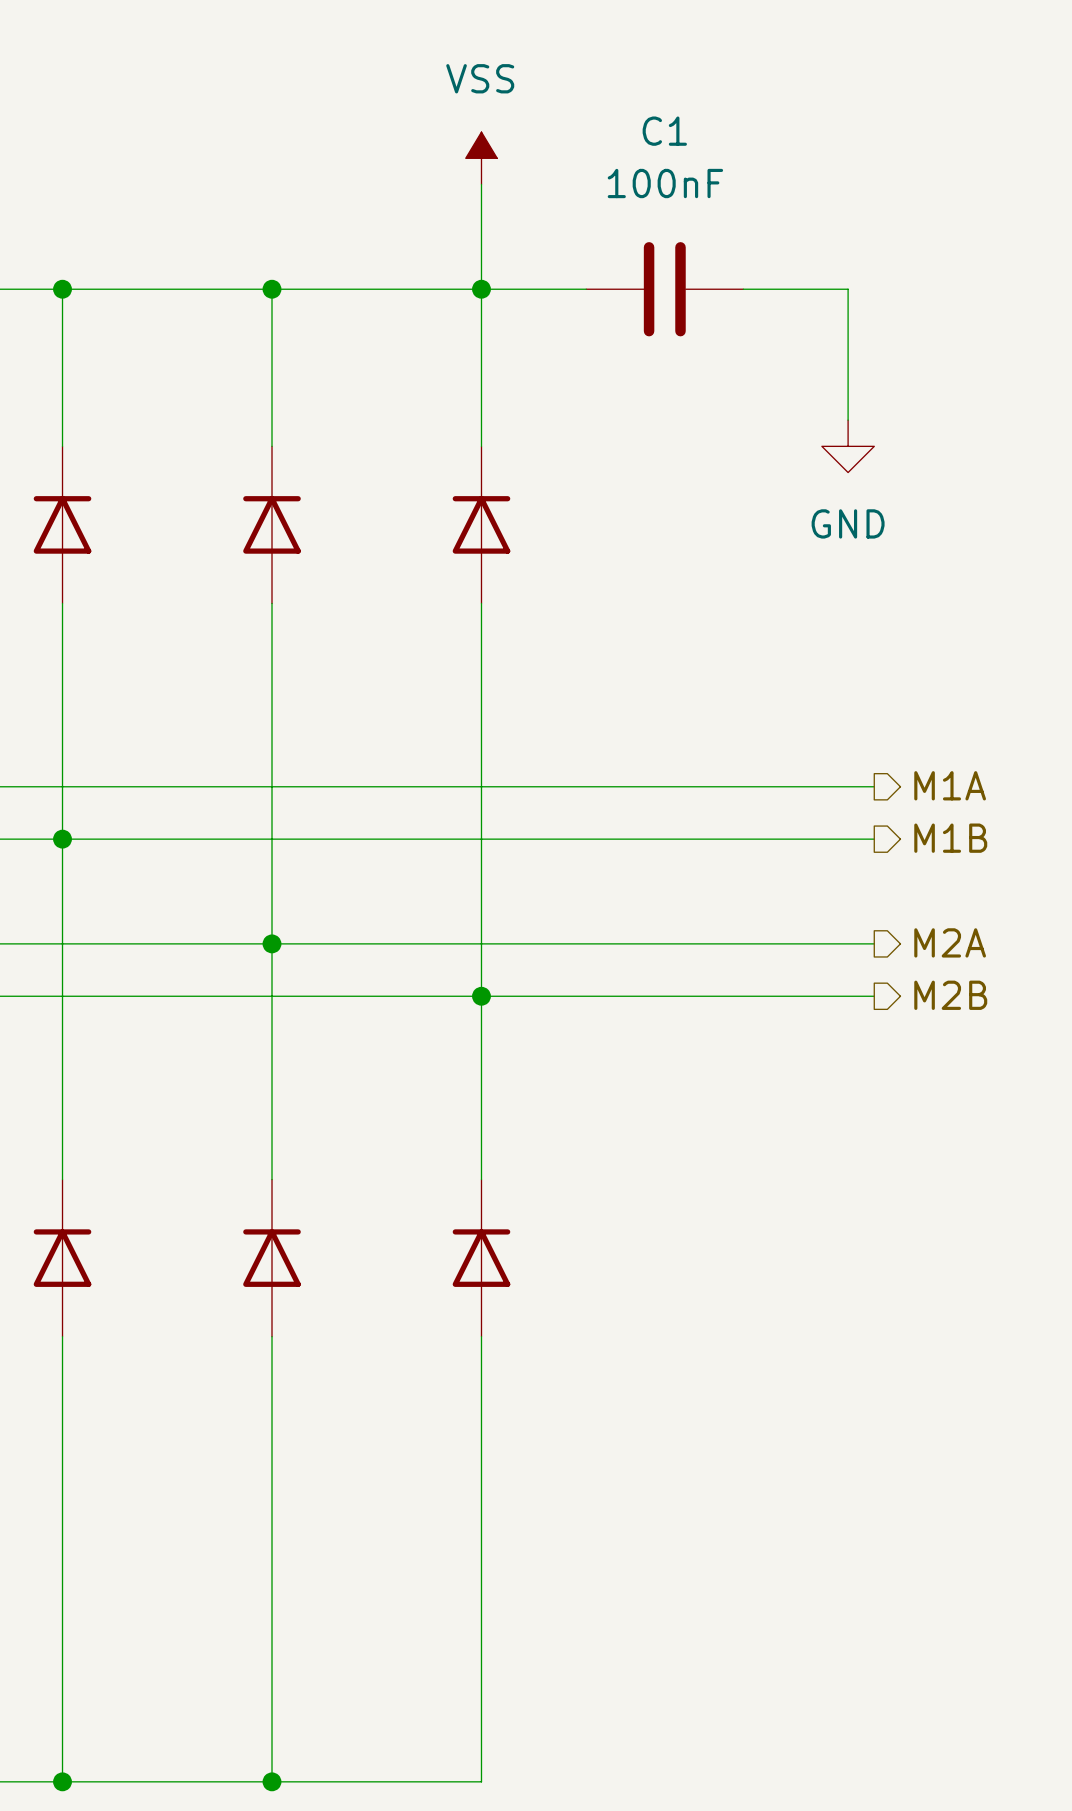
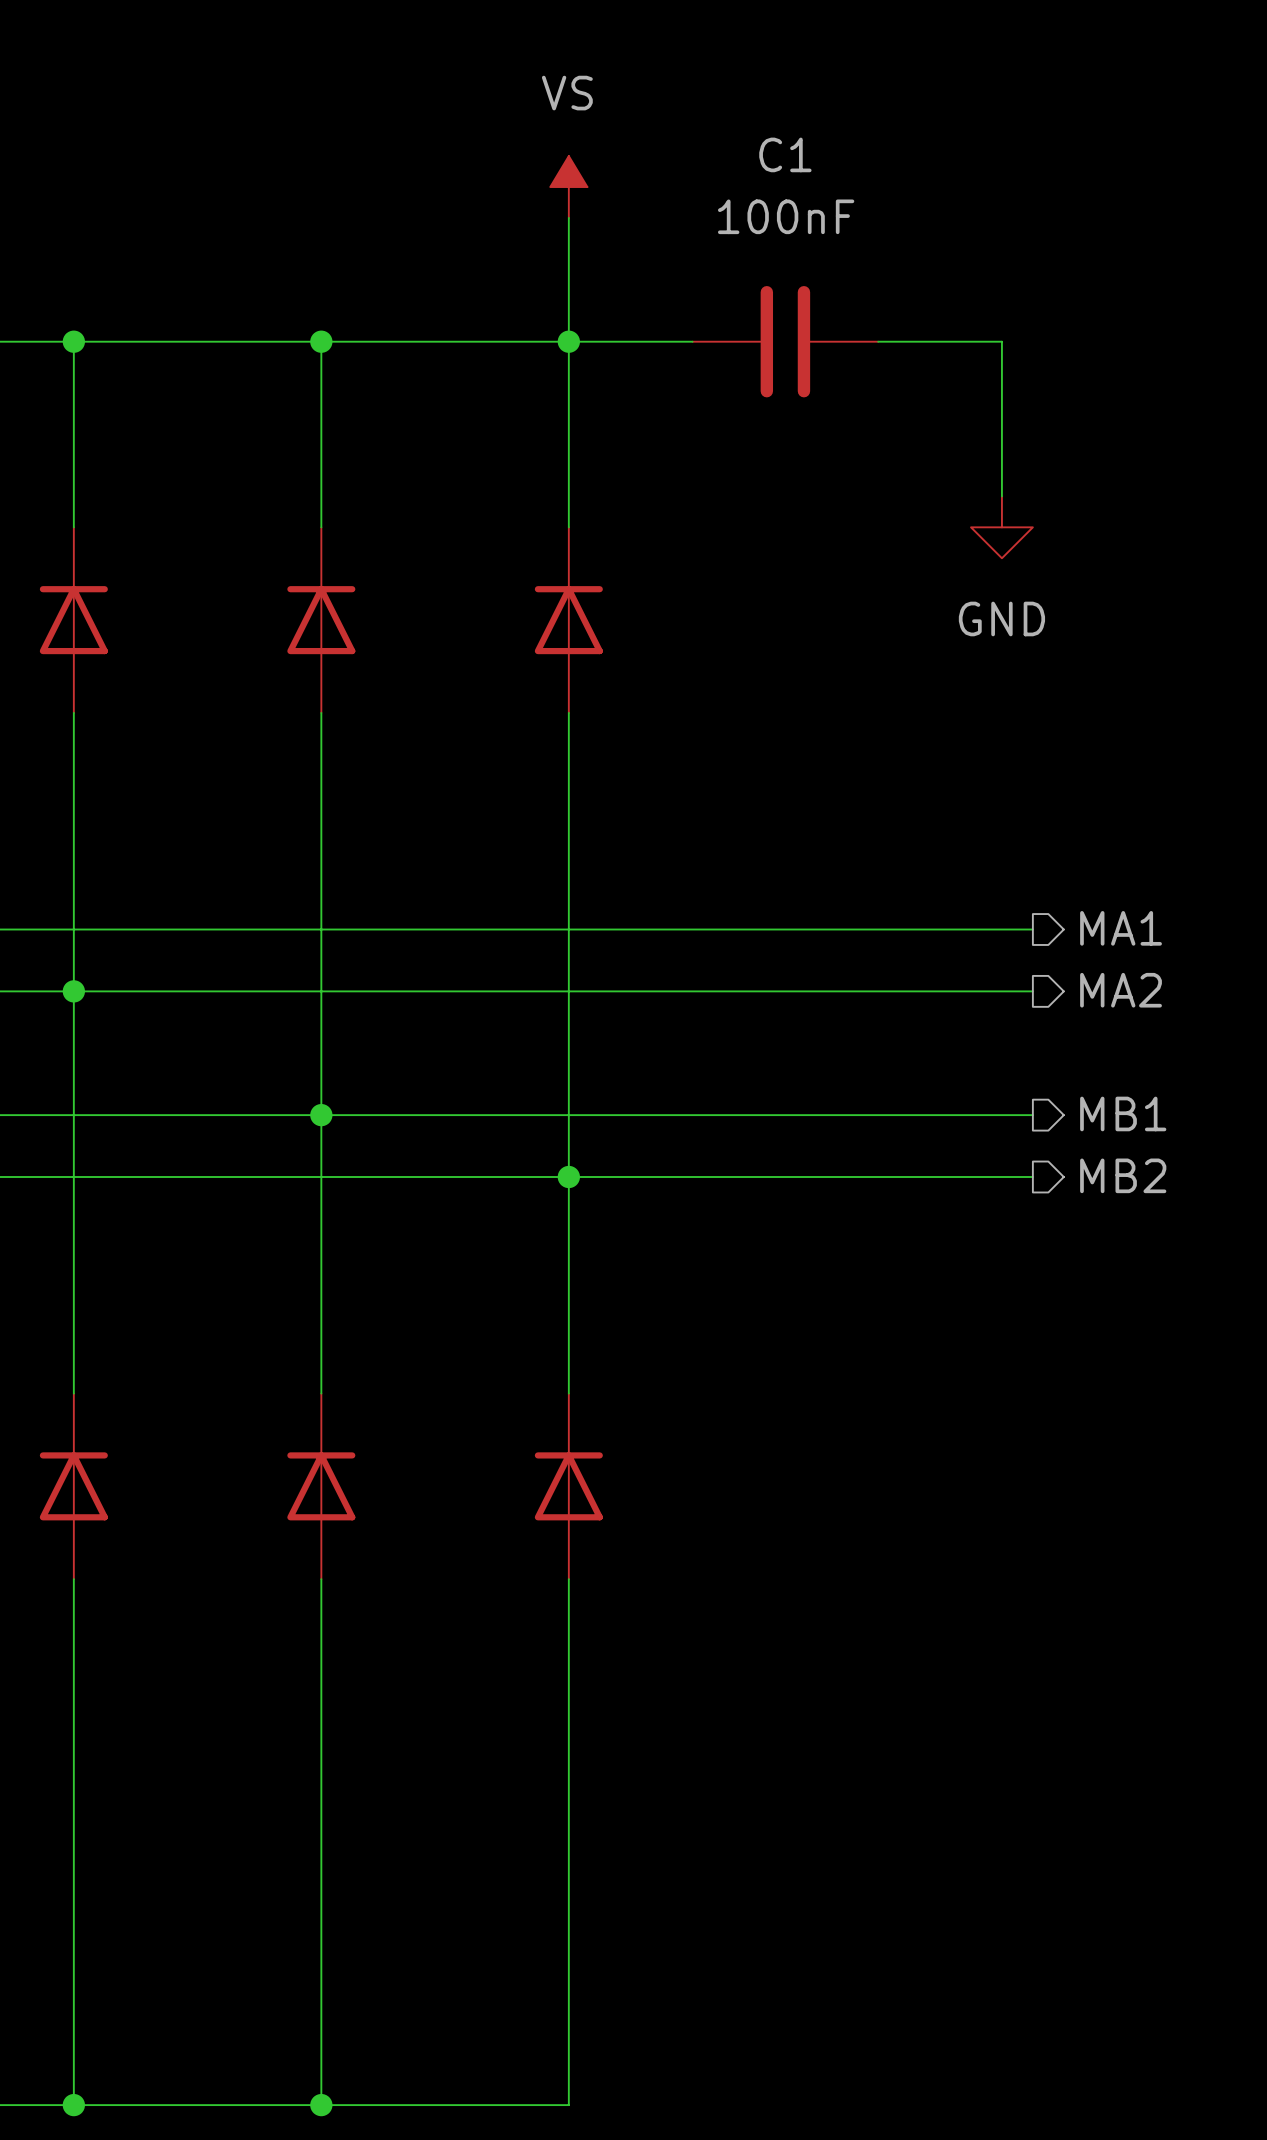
power symbol: VSS (481, 158) -> VS (568, 187)
hierarchical label: M1A (950, 785) -> MA1 (1121, 928)
hierarchical label: M1B (950, 838) -> MA2 (1121, 990)
hierarchical label: M2A (950, 942) -> MB1 (1123, 1113)
hierarchical label: M2B (950, 995) -> MB2 (1123, 1175)

